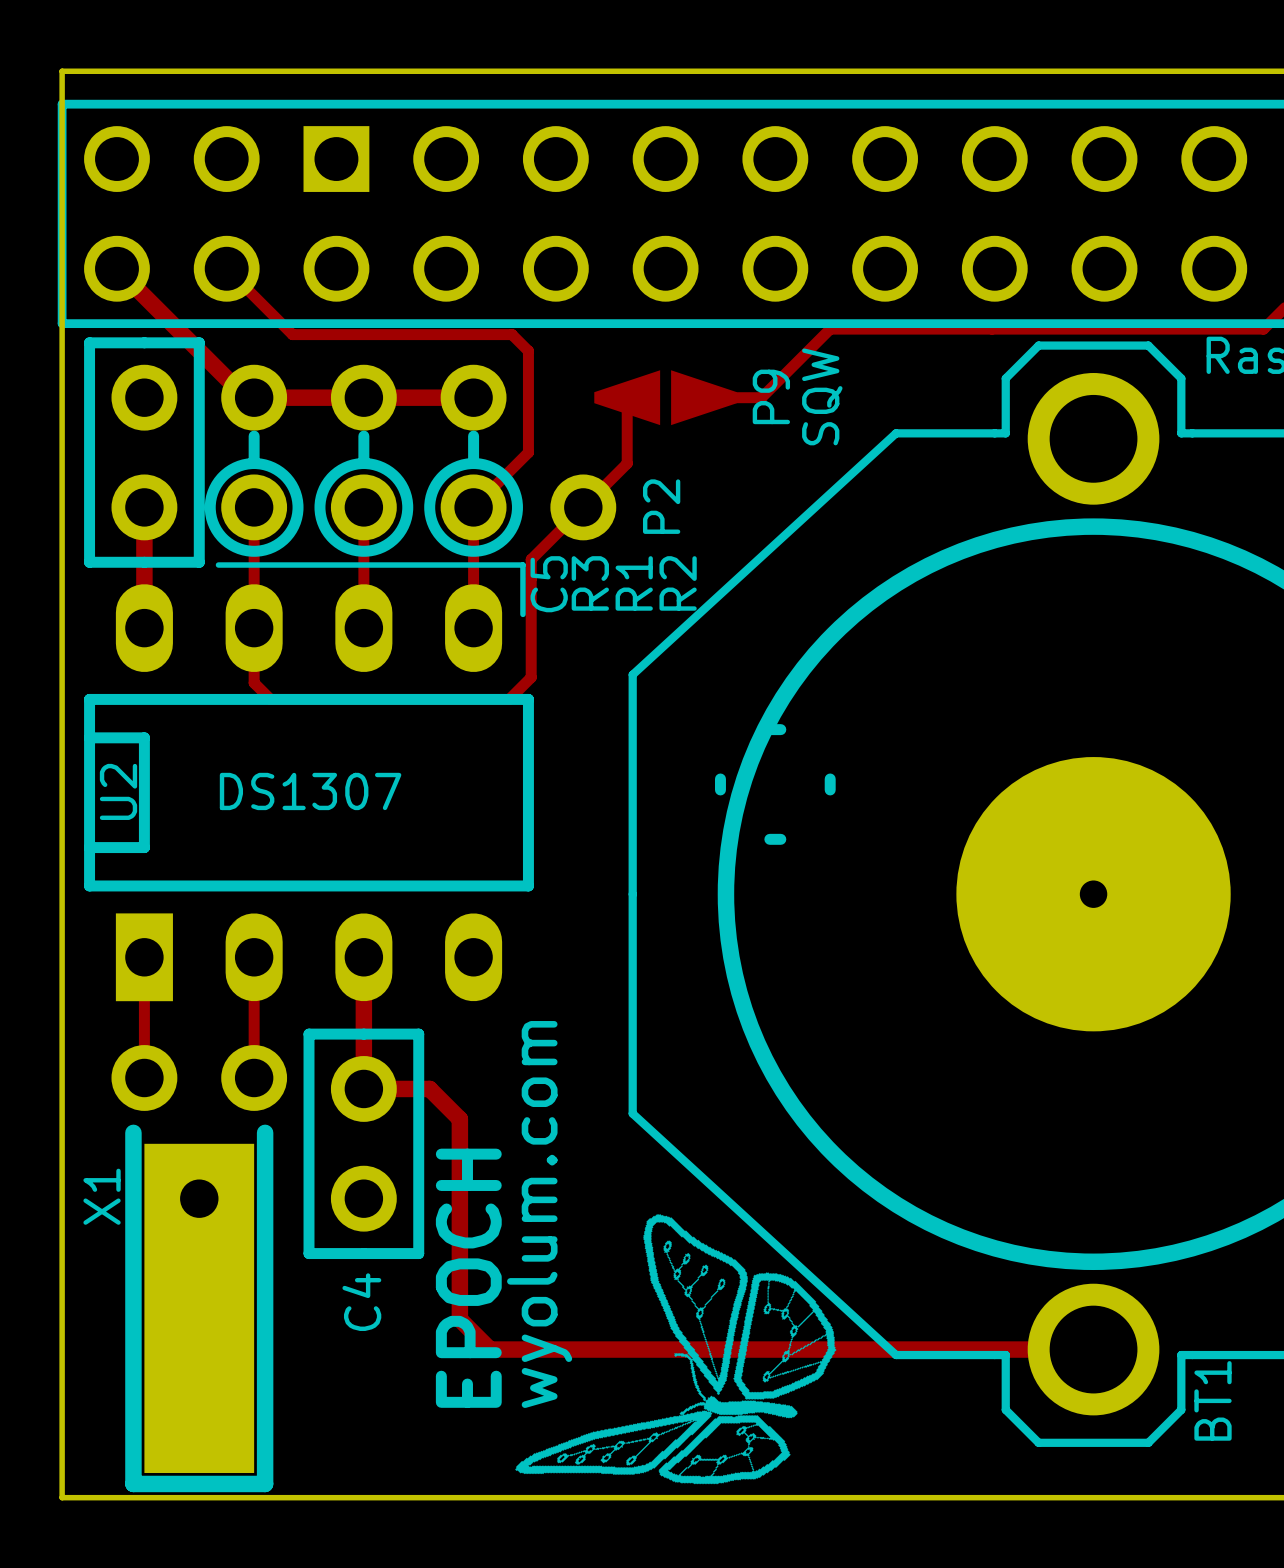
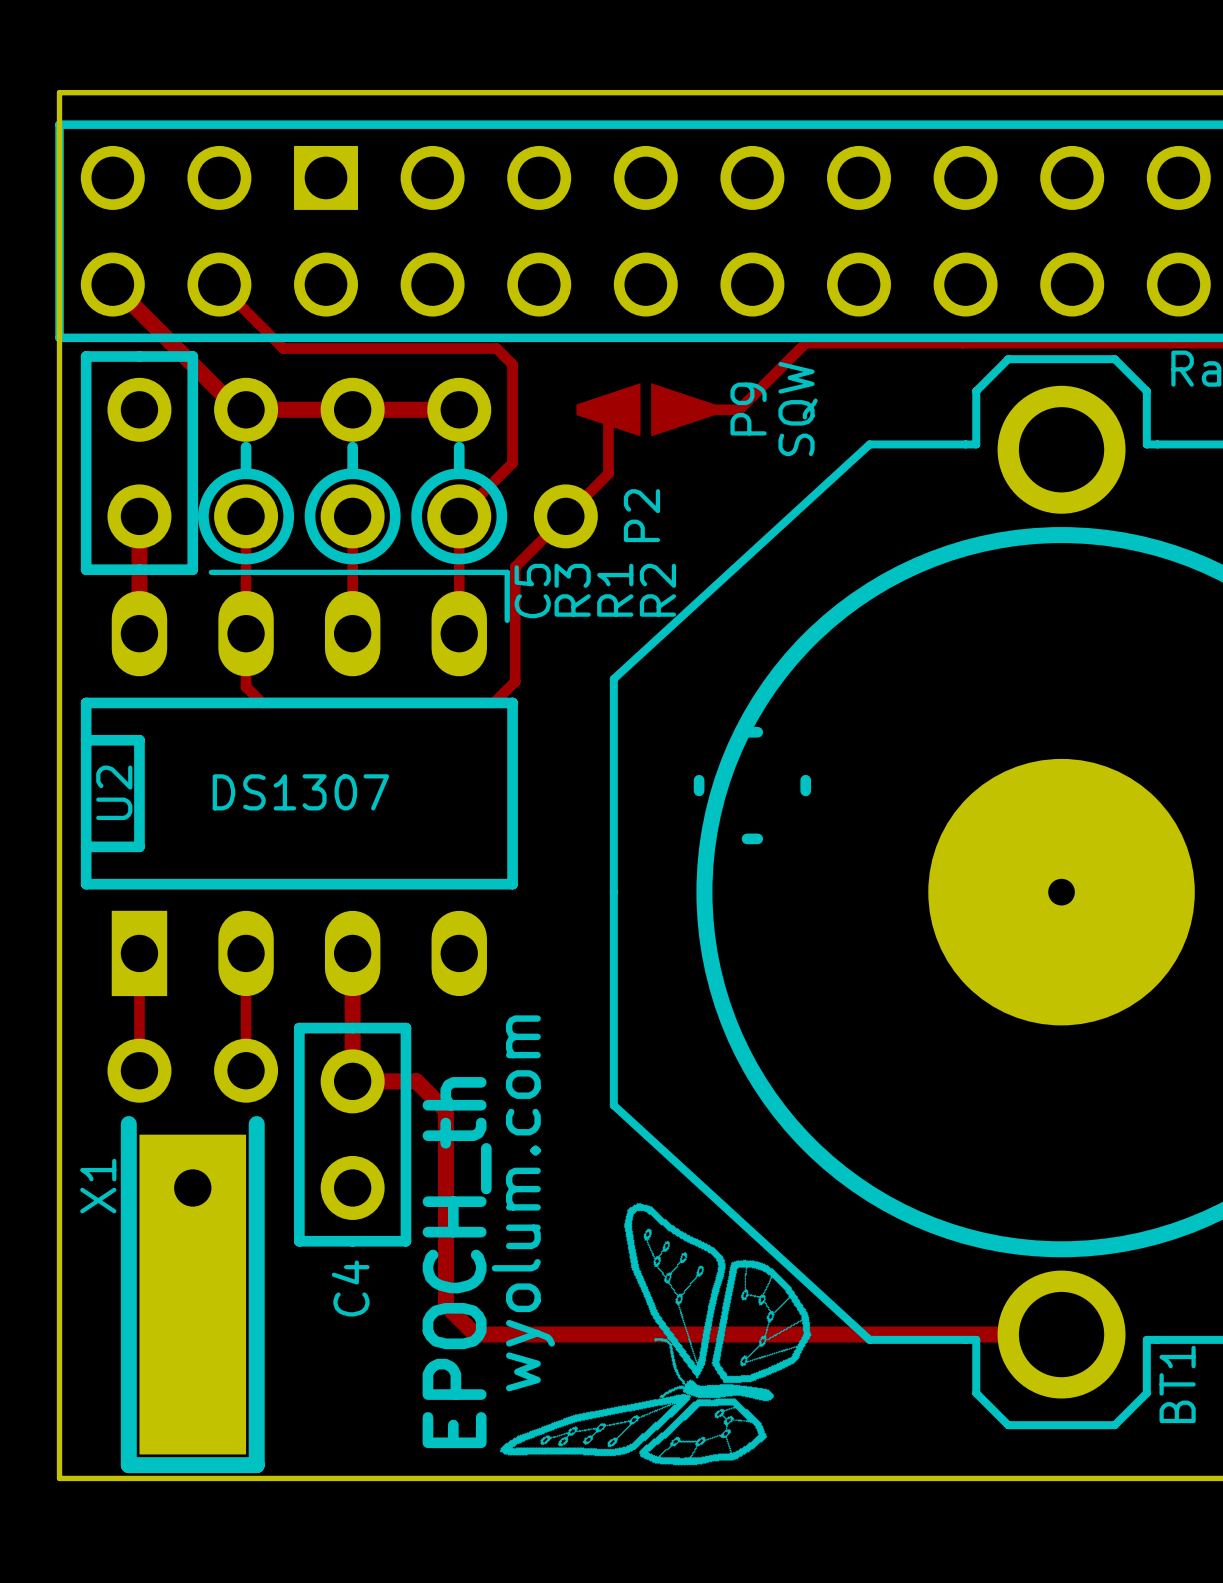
text: EPOCH (468, 1278) -> EPOCH_th (457, 1262)

